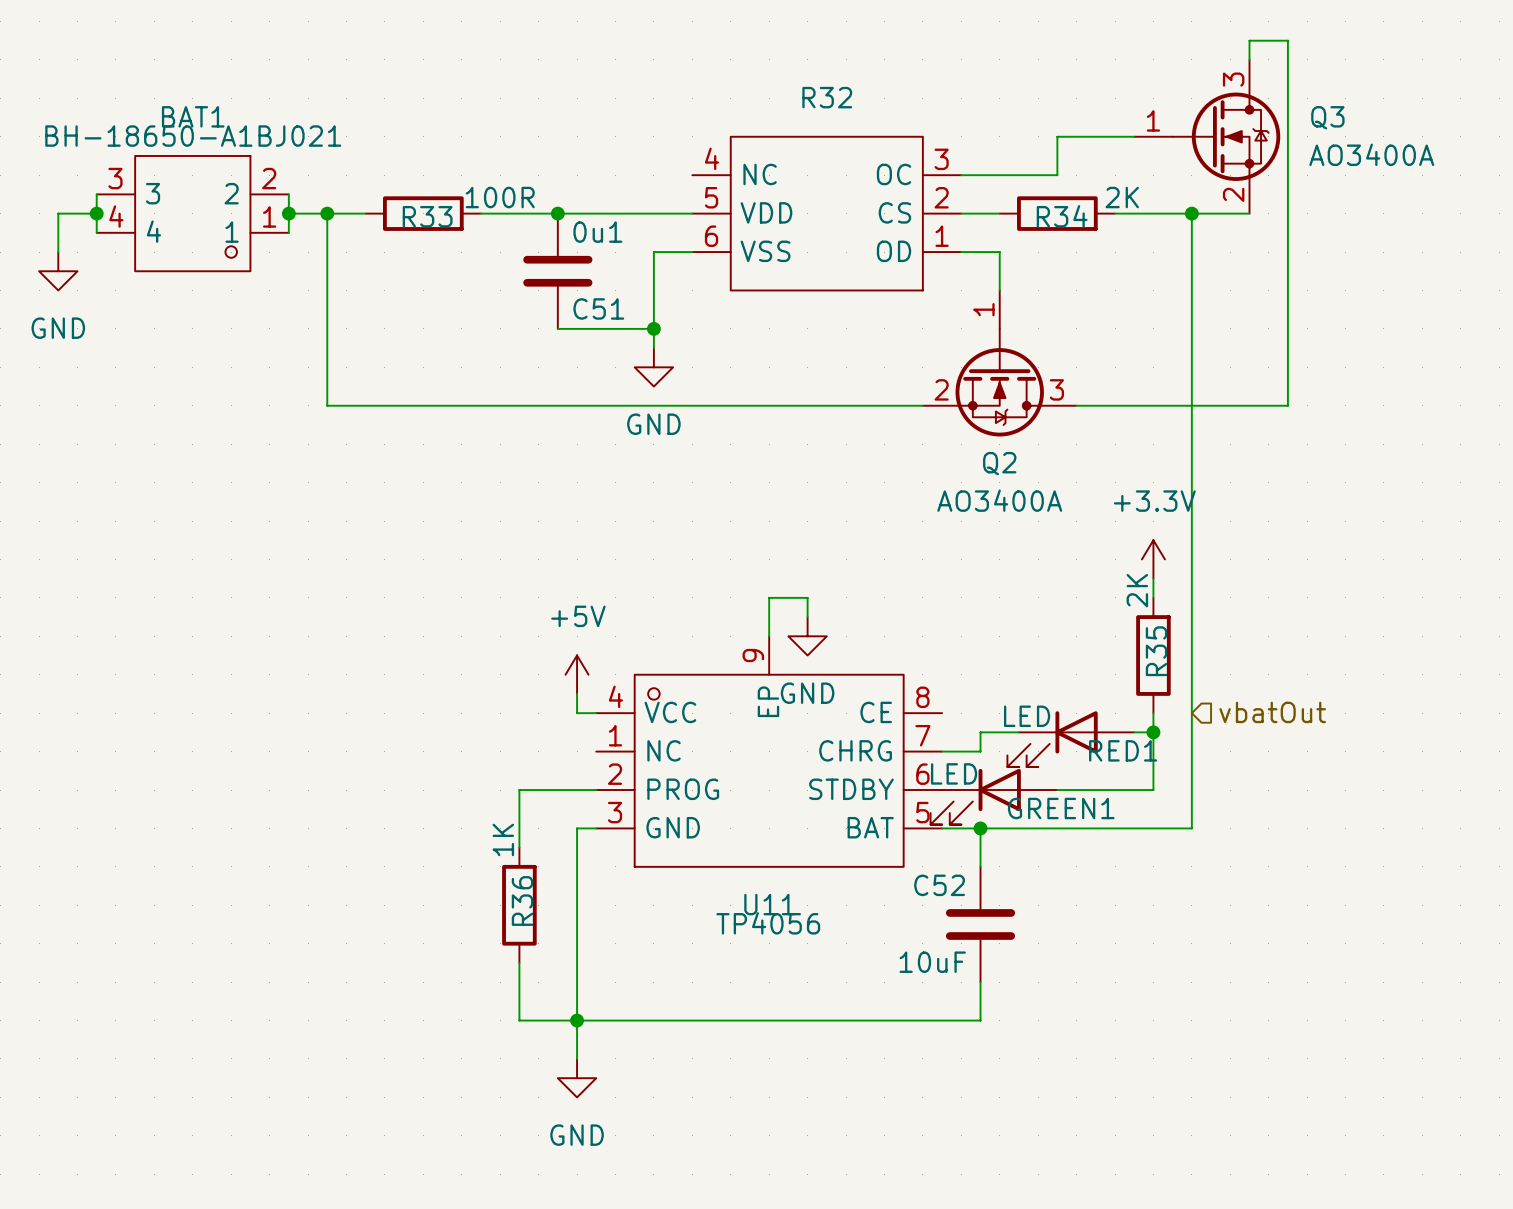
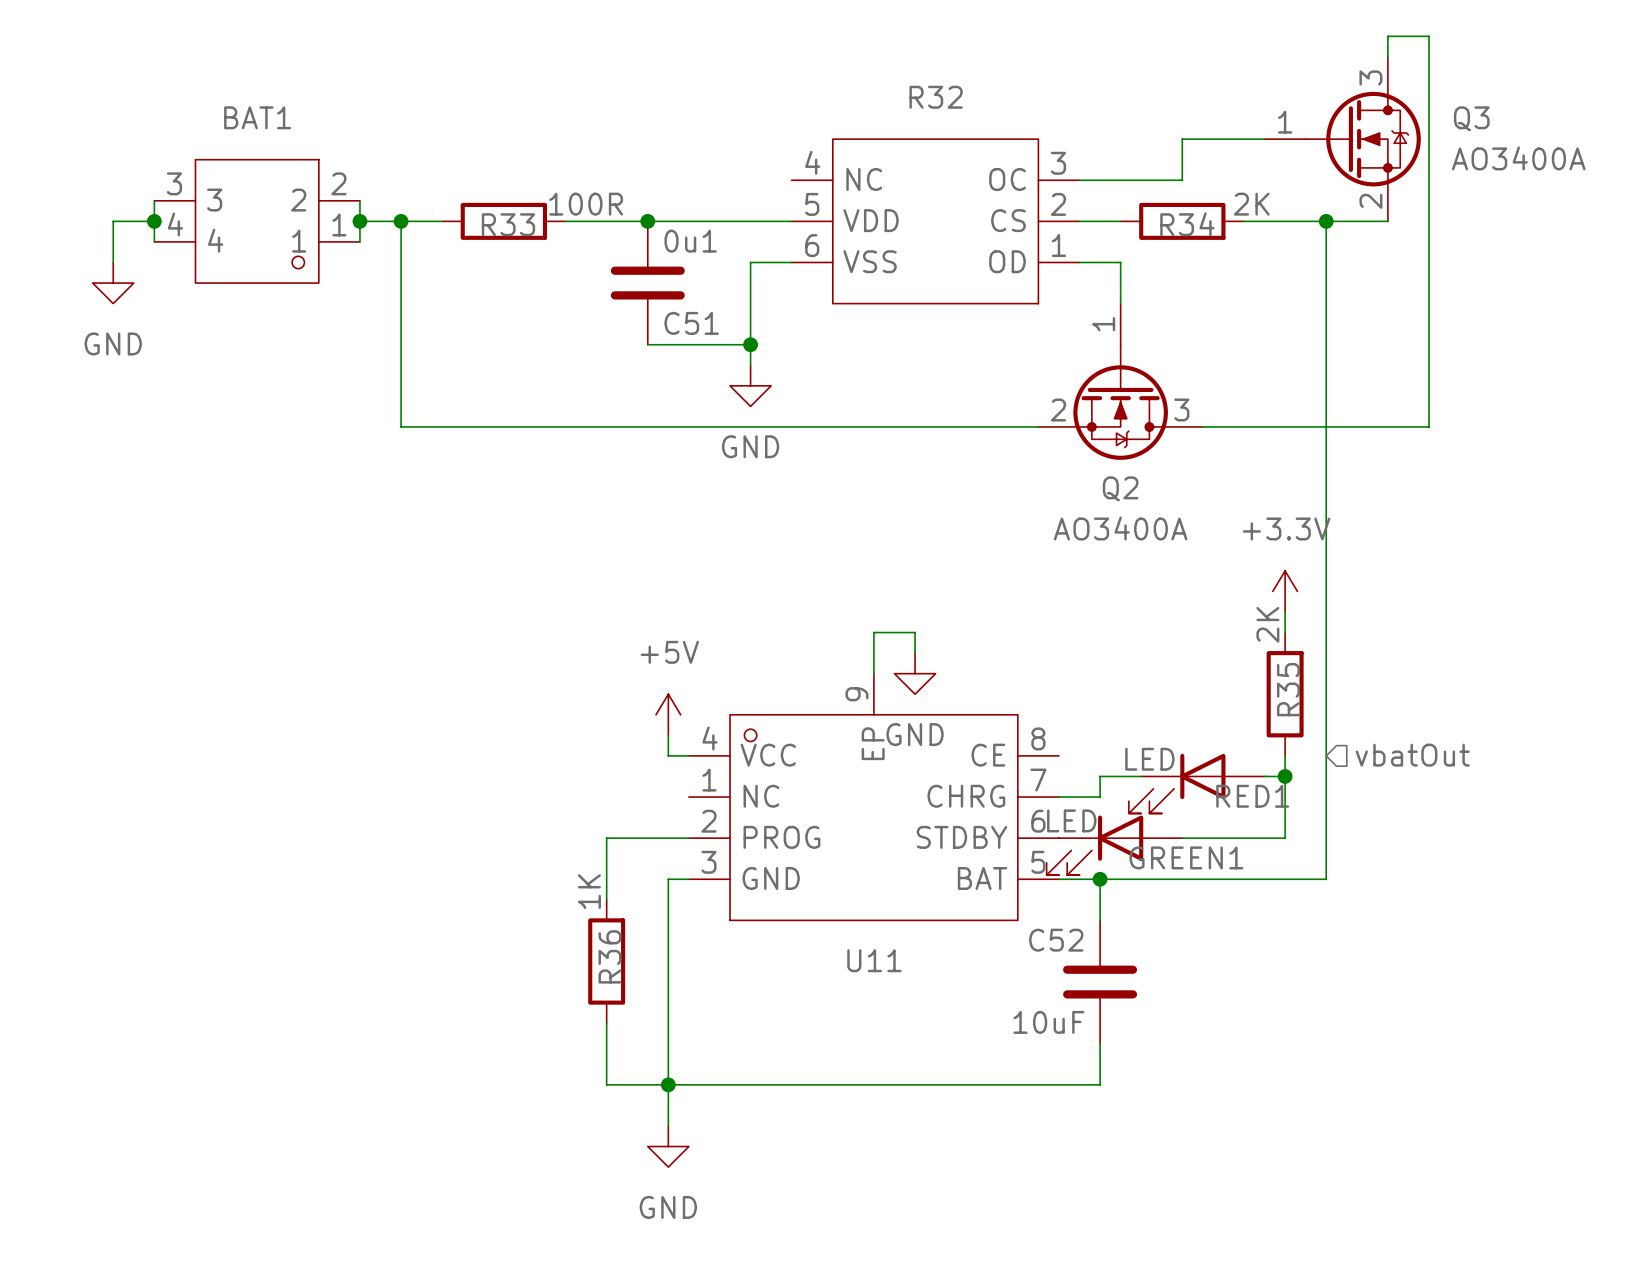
BAT1 value: BH-18650-A1BJ021 (193, 136) -> none
U11 value: TP4056 (768, 923) -> none

